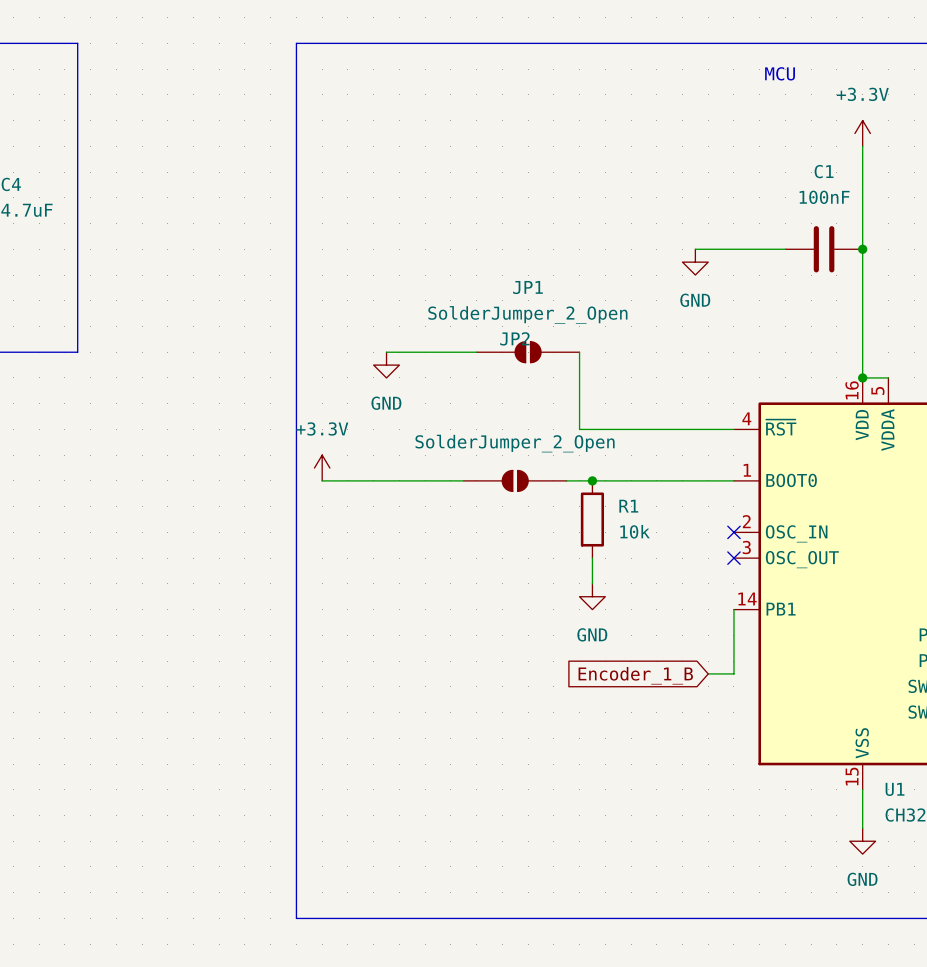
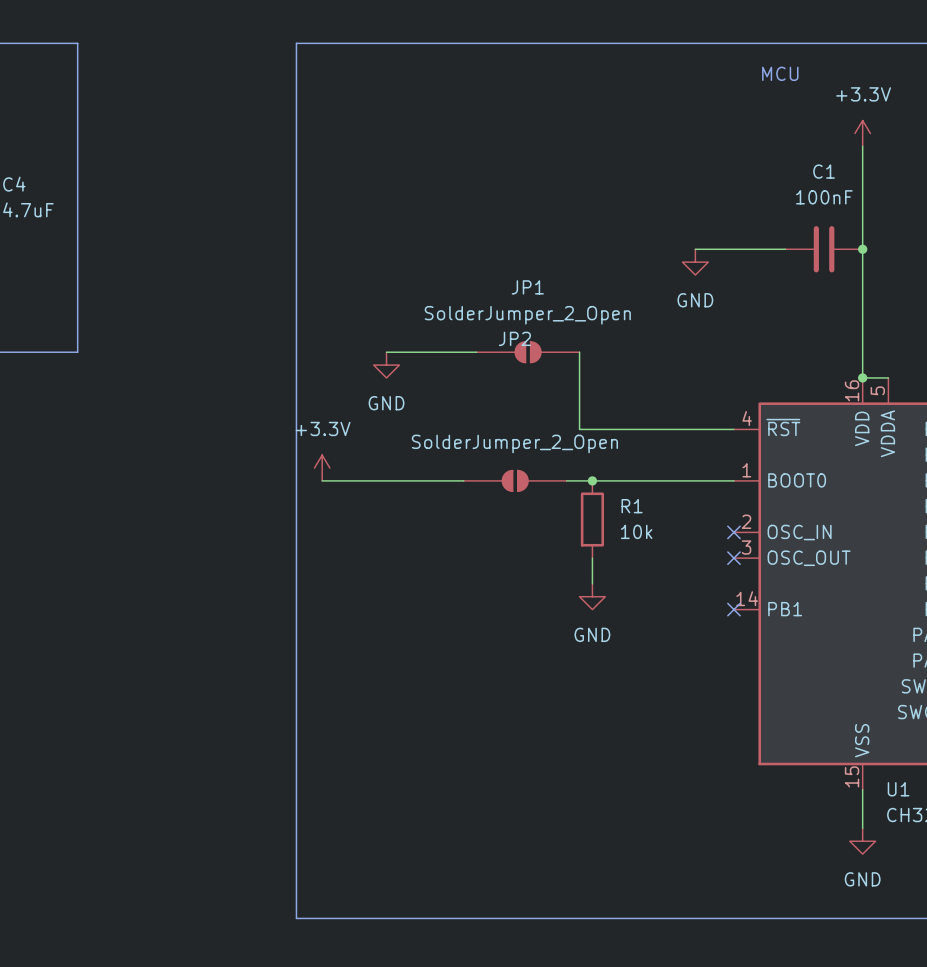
wire: (733, 609) (733, 673) (708, 673) -> none
no-connect mark: none -> (733, 609)
global label: Encoder_1_B (635, 675) -> none

